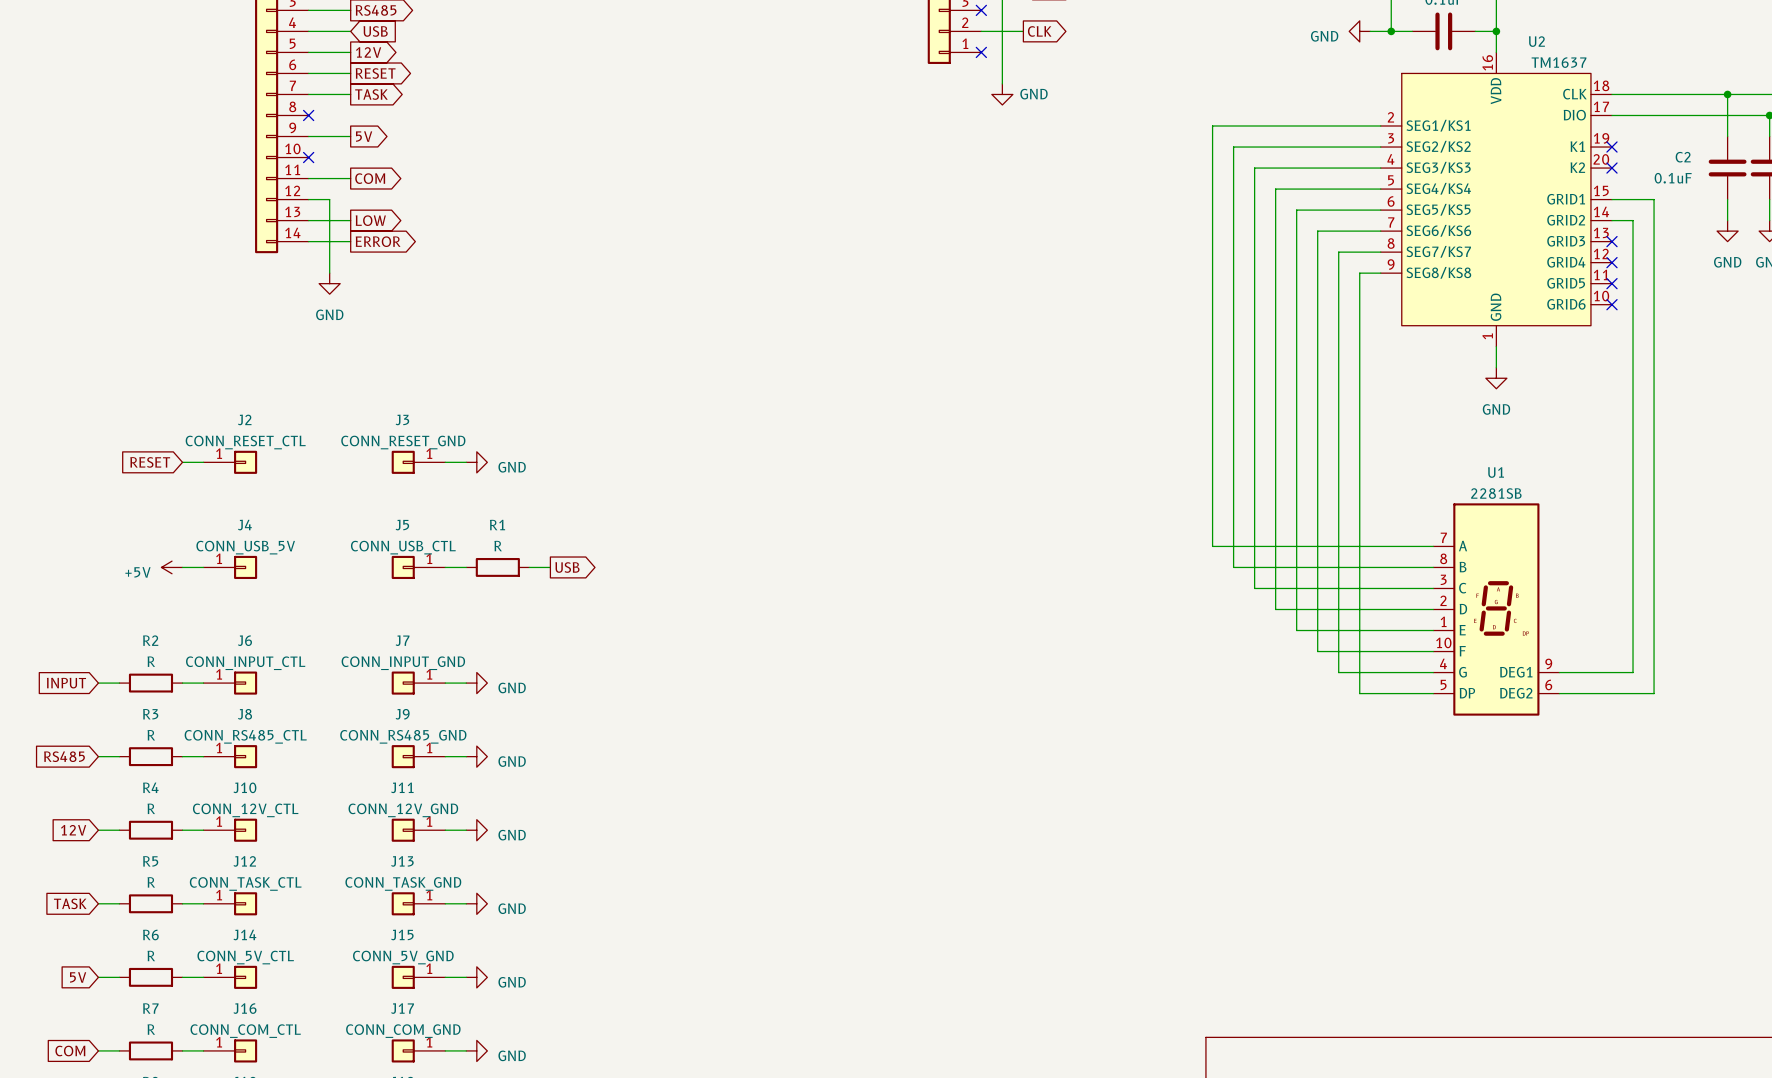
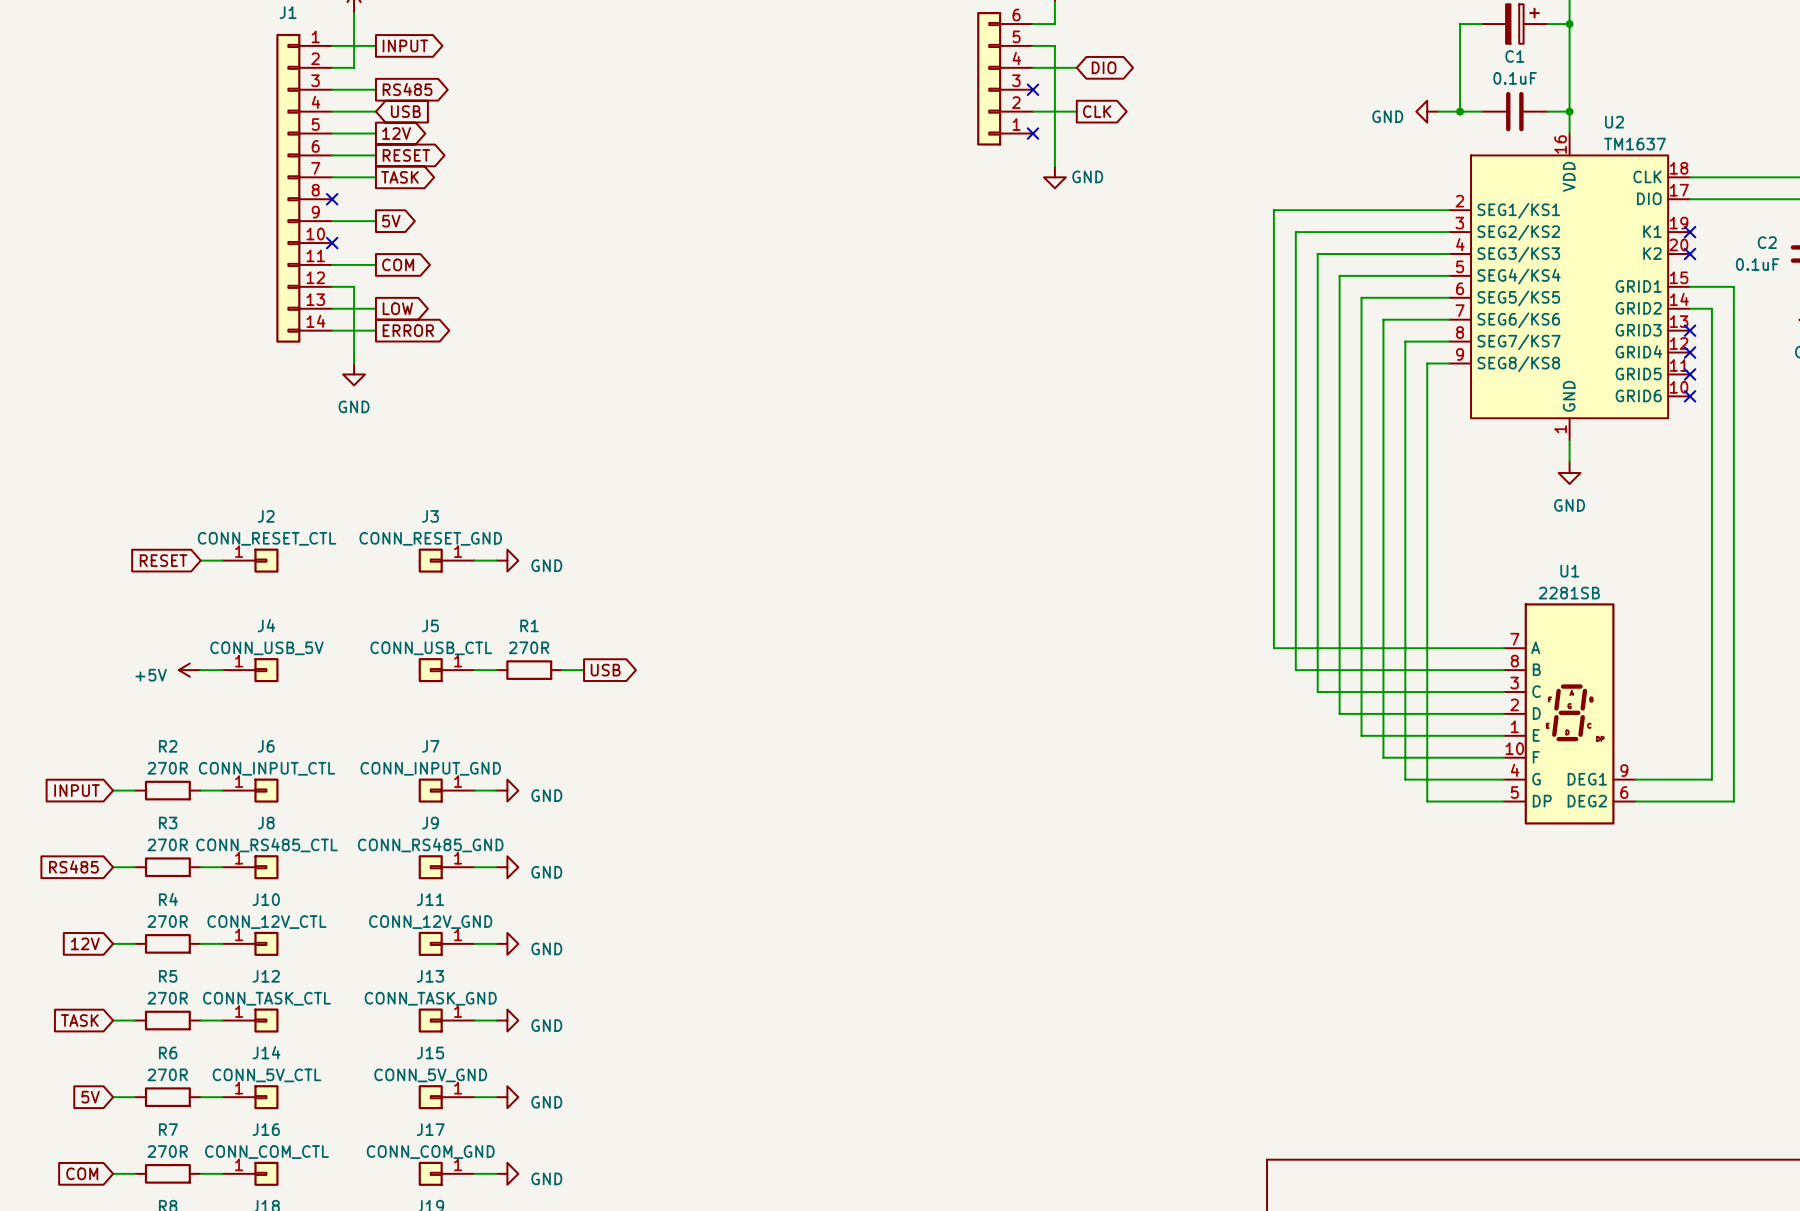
R1 value: R (498, 546) -> 270R (529, 647)
R2 value: R (151, 661) -> 270R (167, 768)
R3 value: R (151, 735) -> 270R (167, 844)
R4 value: R (151, 808) -> 270R (167, 921)
R5 value: R (151, 882) -> 270R (167, 998)
R6 value: R (151, 955) -> 270R (167, 1074)
R7 value: R (151, 1029) -> 270R (167, 1151)

